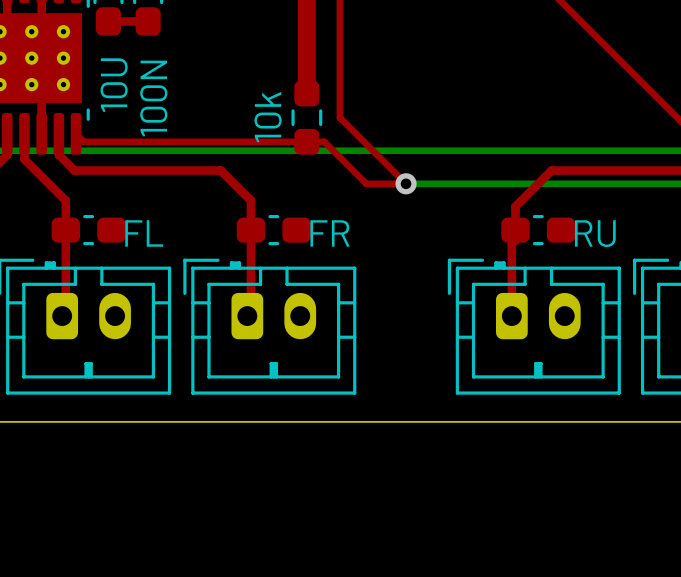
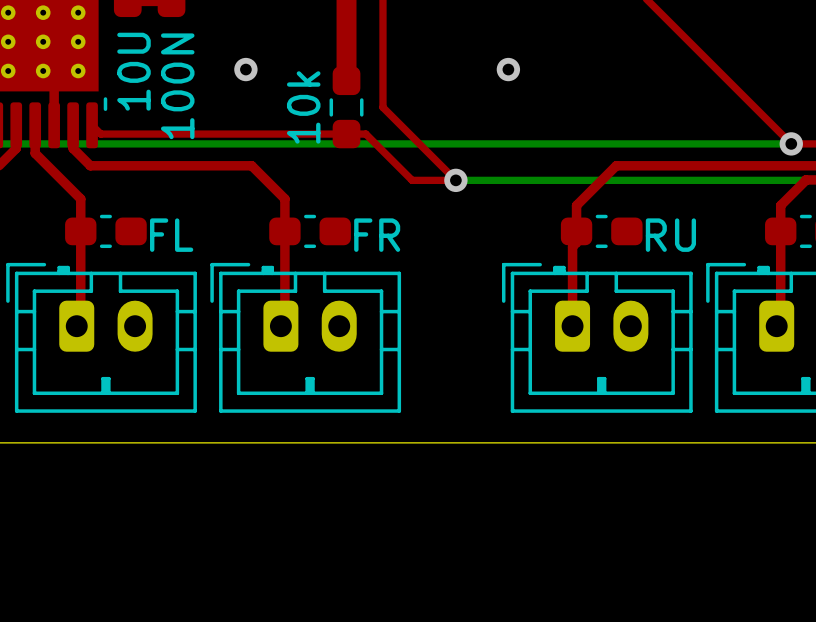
via: none -> (245, 69)
via: none -> (508, 69)

